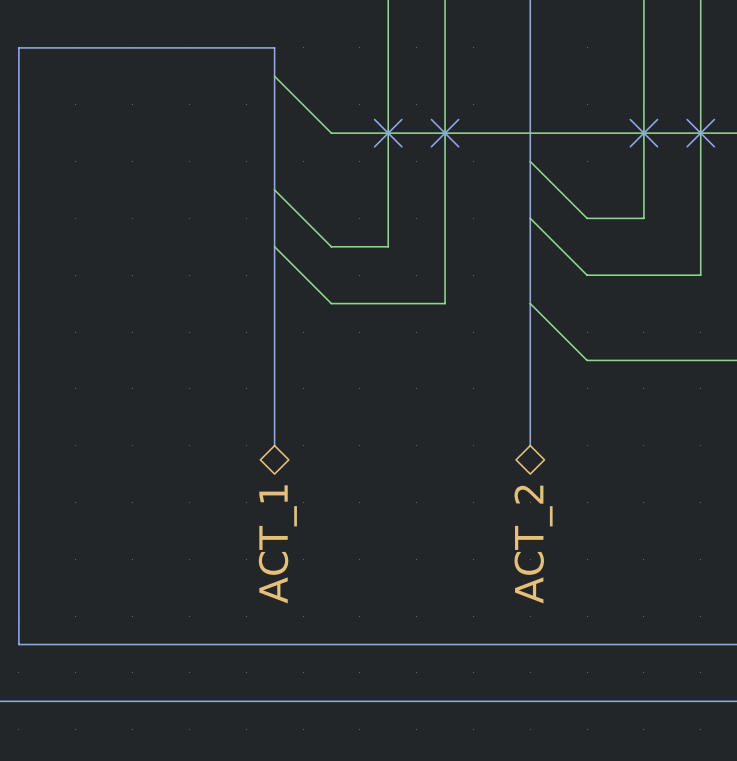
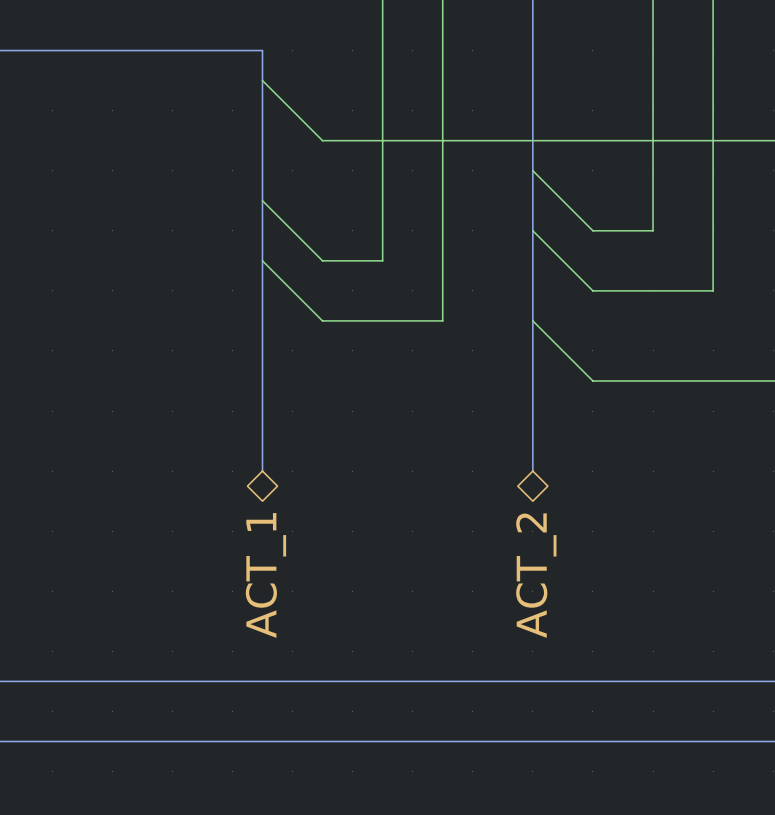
no-connect mark: (388, 133) -> none
no-connect mark: (445, 133) -> none
no-connect mark: (643, 133) -> none
no-connect mark: (700, 133) -> none

